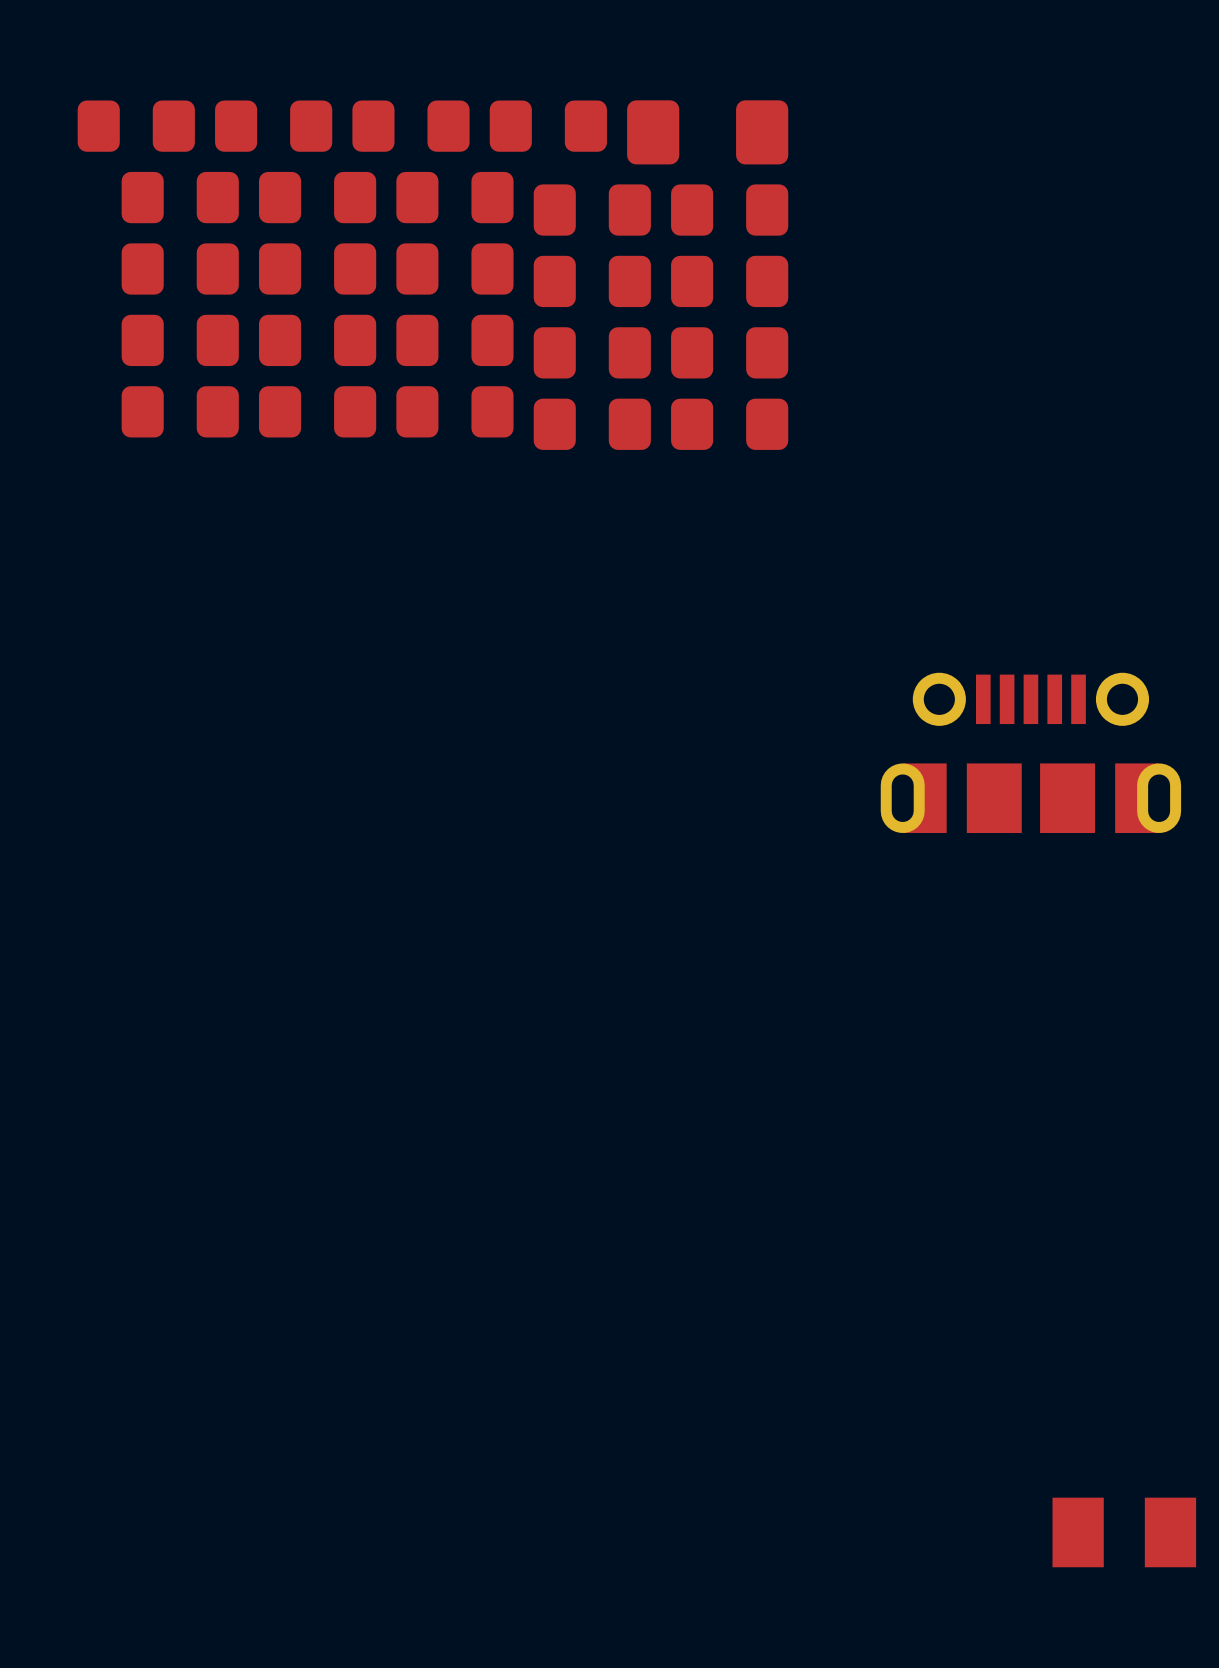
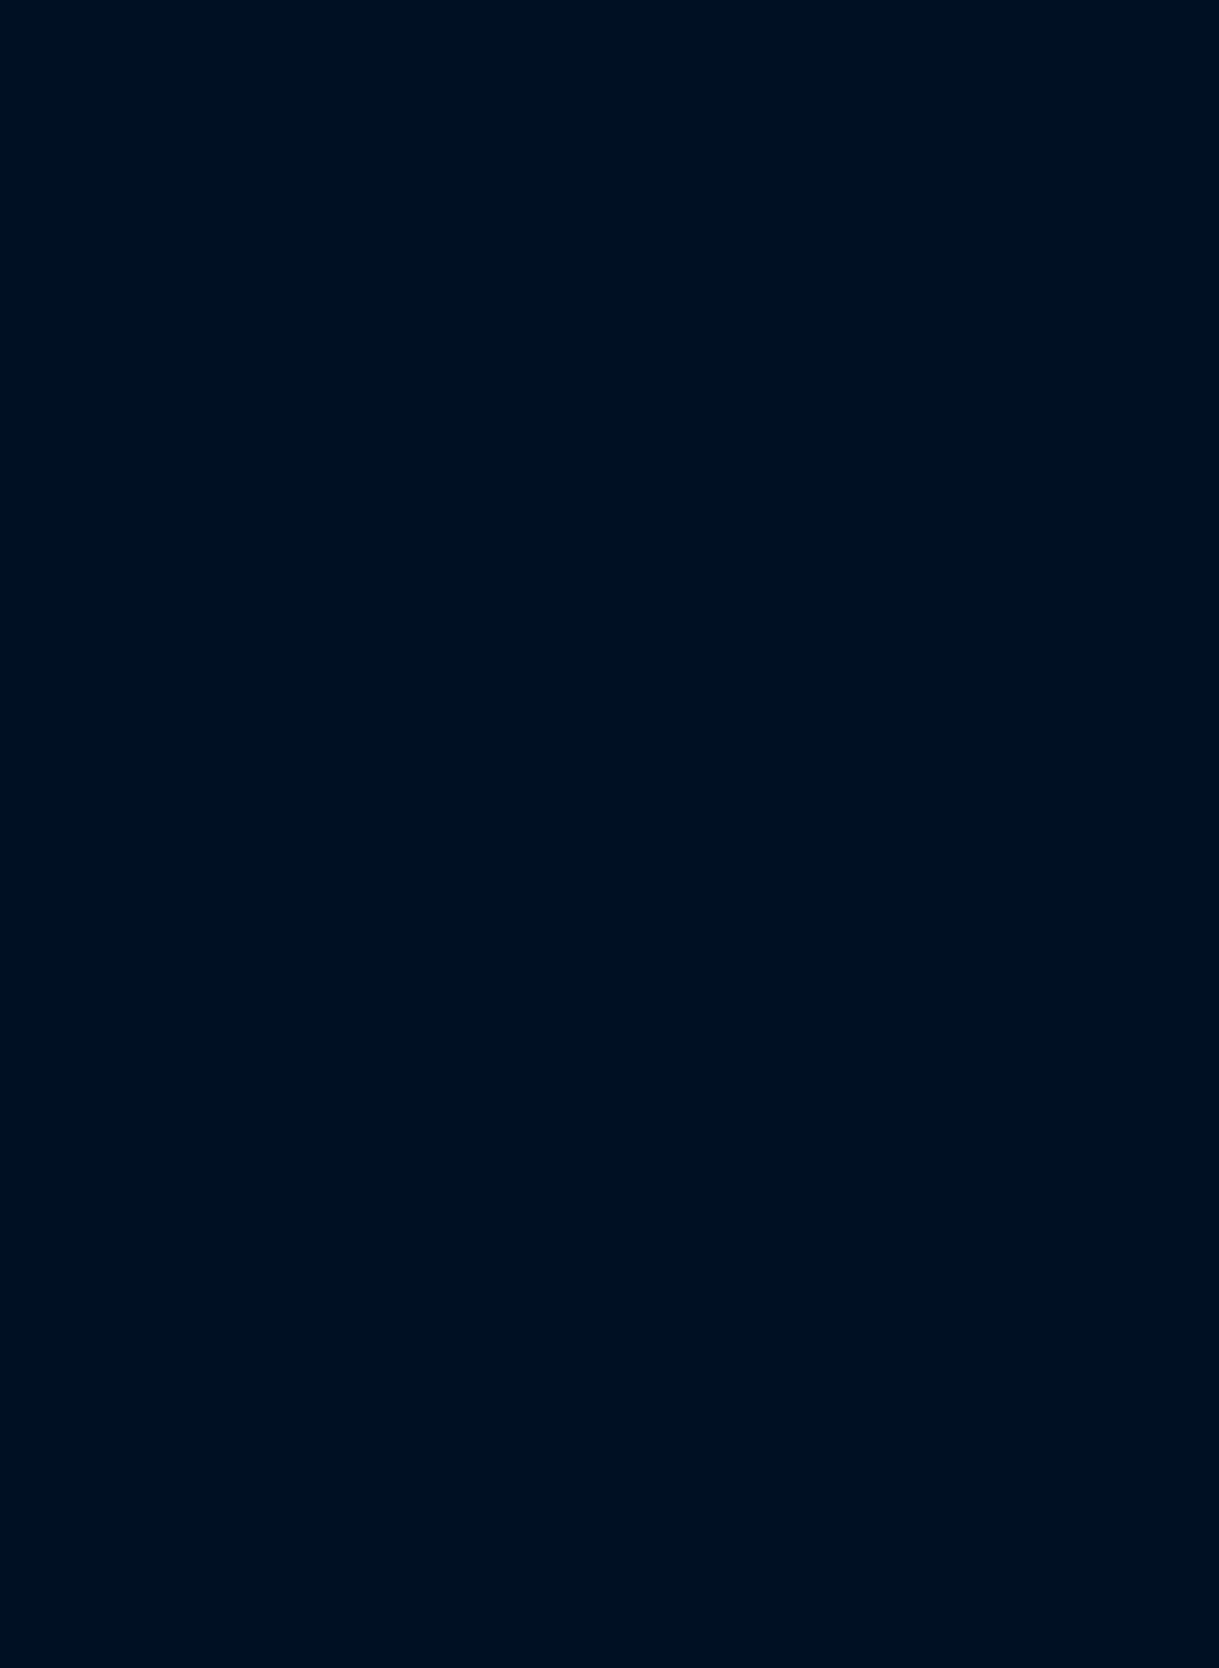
part: (136, 126) -> none
part: (273, 126) -> none
part: (411, 126) -> none
part: (548, 126) -> none
part: (707, 132) -> none
part: (180, 197) -> none
part: (317, 197) -> none
part: (454, 197) -> none
part: (592, 210) -> none
part: (729, 210) -> none
part: (180, 268) -> none
part: (317, 268) -> none
part: (454, 268) -> none
part: (592, 281) -> none
part: (729, 281) -> none
part: (180, 340) -> none
part: (317, 340) -> none
part: (454, 340) -> none
part: (592, 352) -> none
part: (729, 352) -> none
part: (180, 411) -> none
part: (317, 411) -> none
part: (454, 411) -> none
part: (592, 424) -> none
part: (729, 424) -> none
part: (1030, 752) -> none
part: (1124, 1532) -> none

